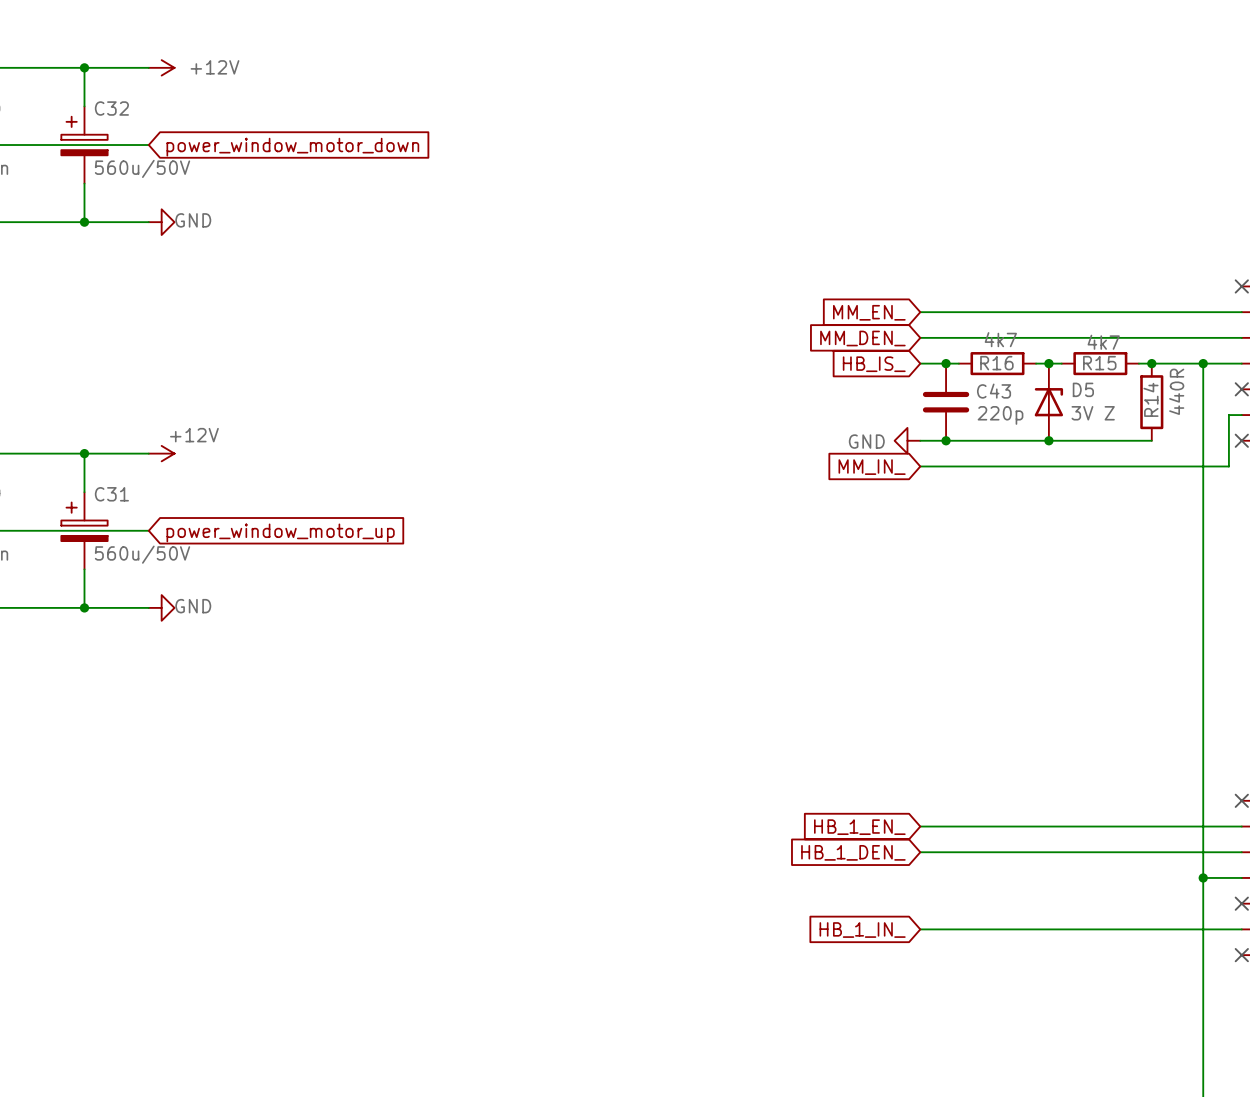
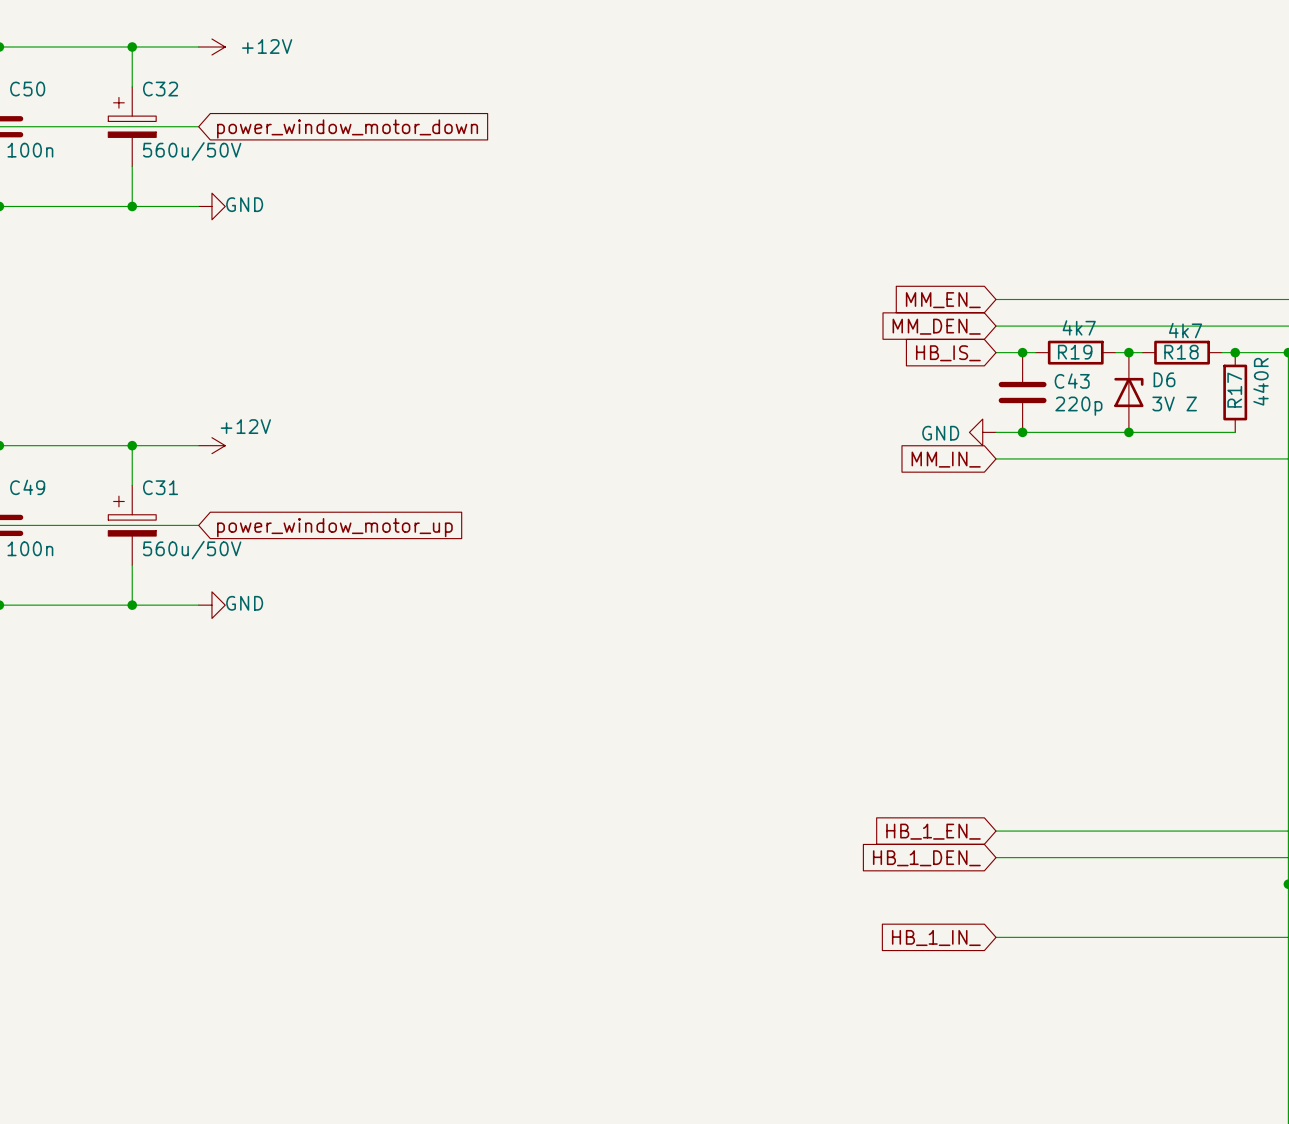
R16 name: R16 (996, 363) -> R19 (1075, 352)
R15 name: R15 (1099, 363) -> R18 (1181, 352)
D5 name: D5 (1083, 389) -> D6 (1164, 379)
R14 name: R14 (1151, 399) -> R17 (1234, 390)

